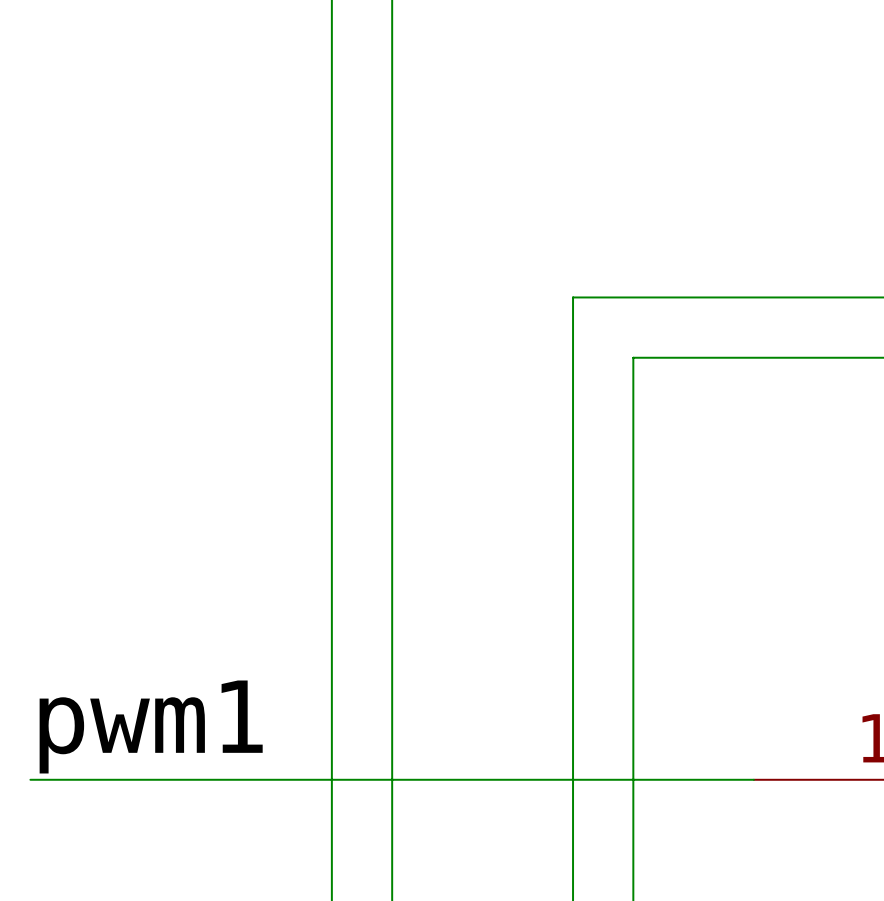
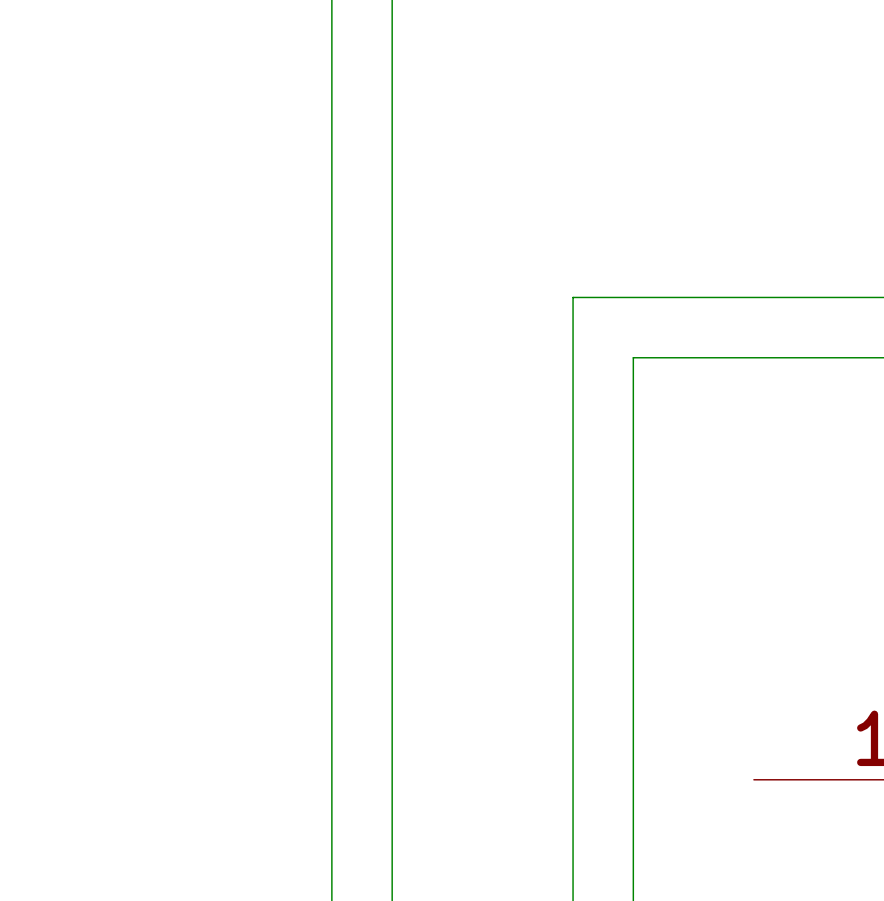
label: pwm1 (151, 726) -> none
wire: (30, 779) (753, 779) -> none

